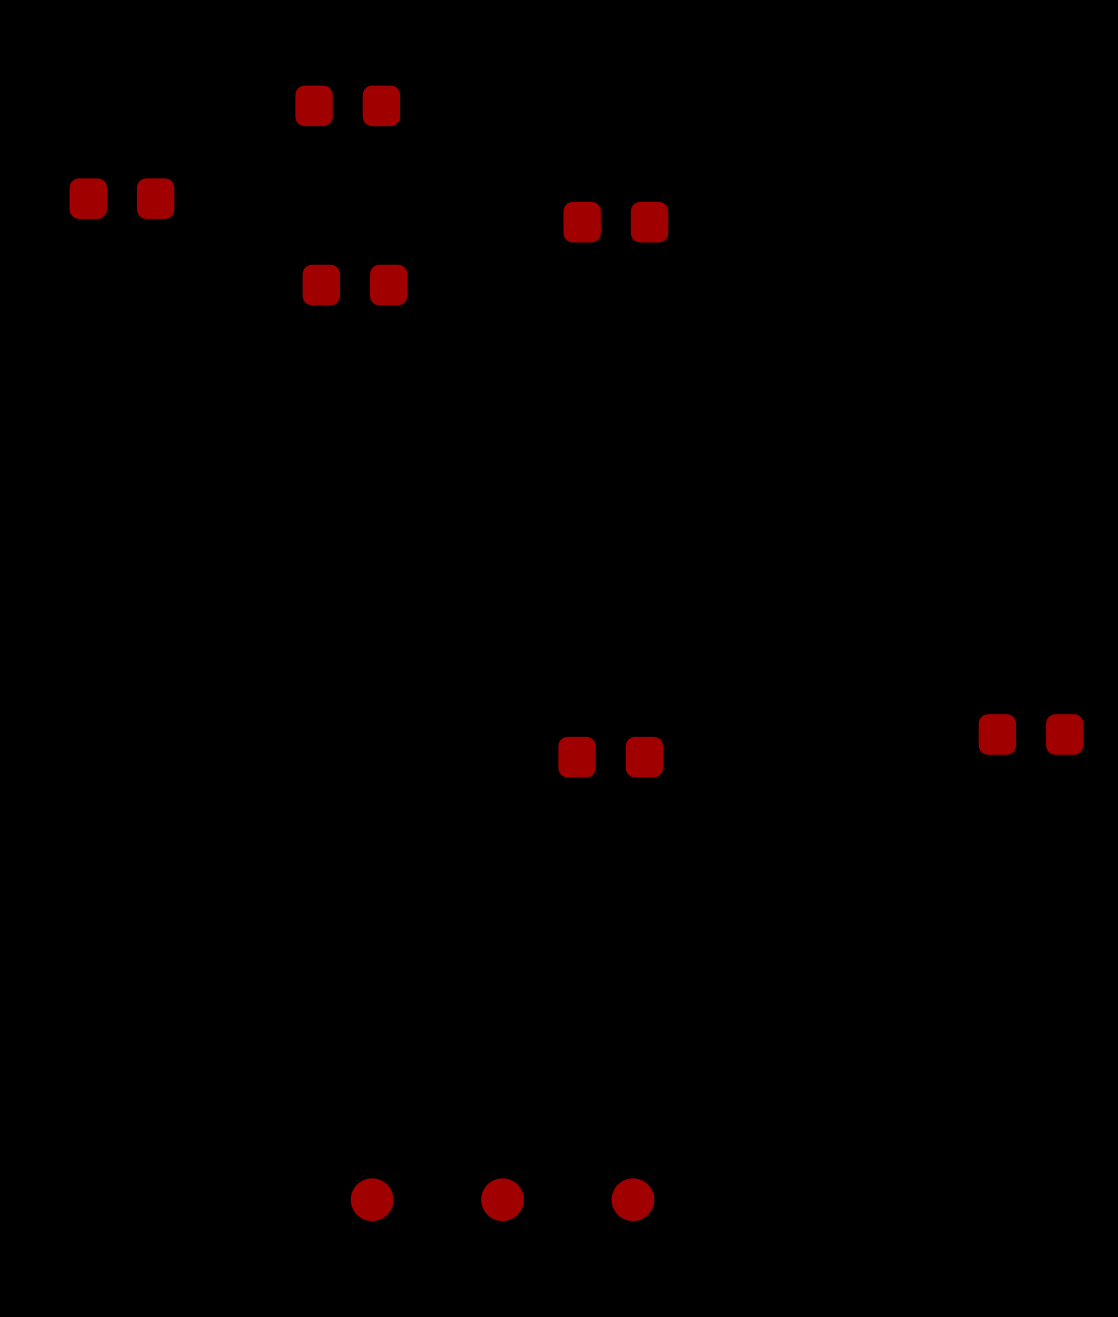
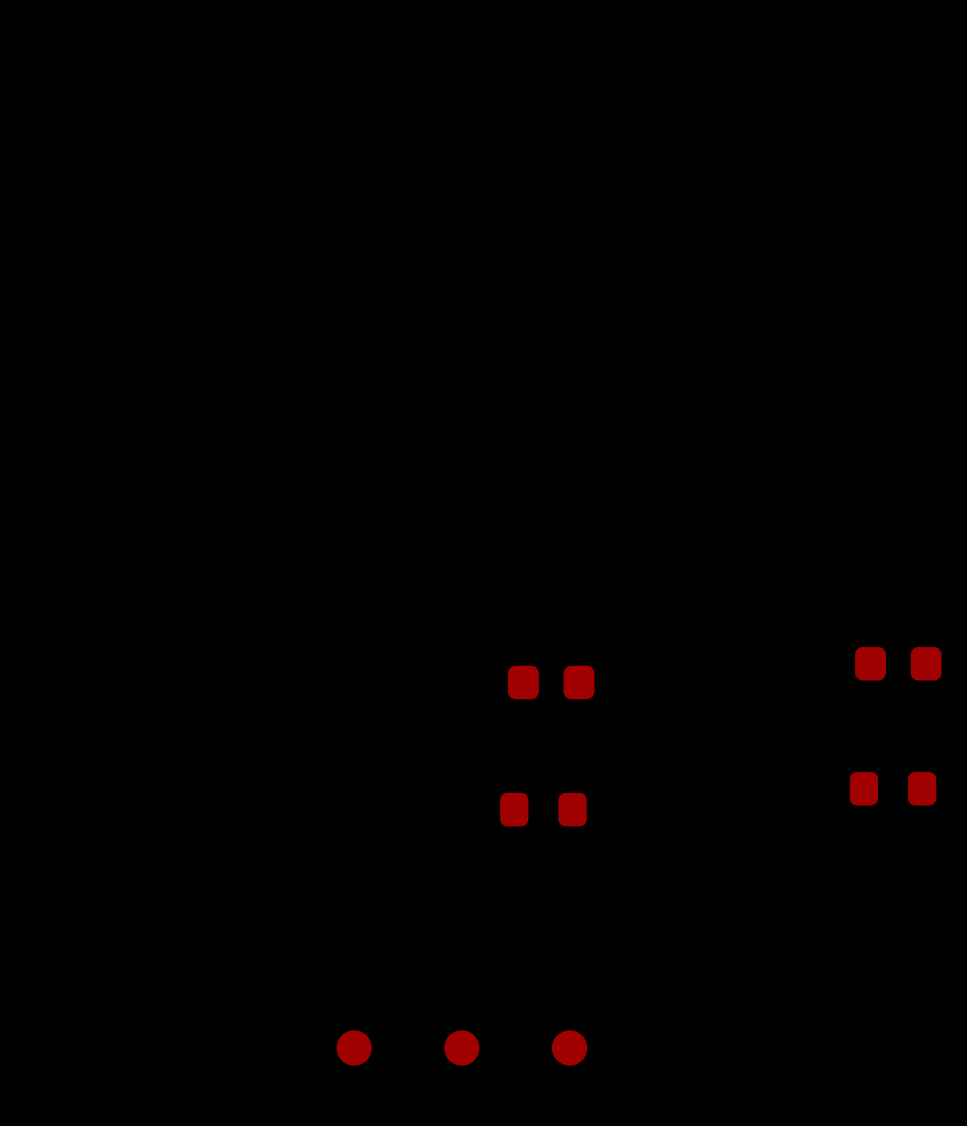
part: (347, 105) -> none
part: (121, 198) -> none
part: (615, 222) -> none
part: (355, 285) -> none
part: none -> (893, 788)
part: none -> (543, 809)

